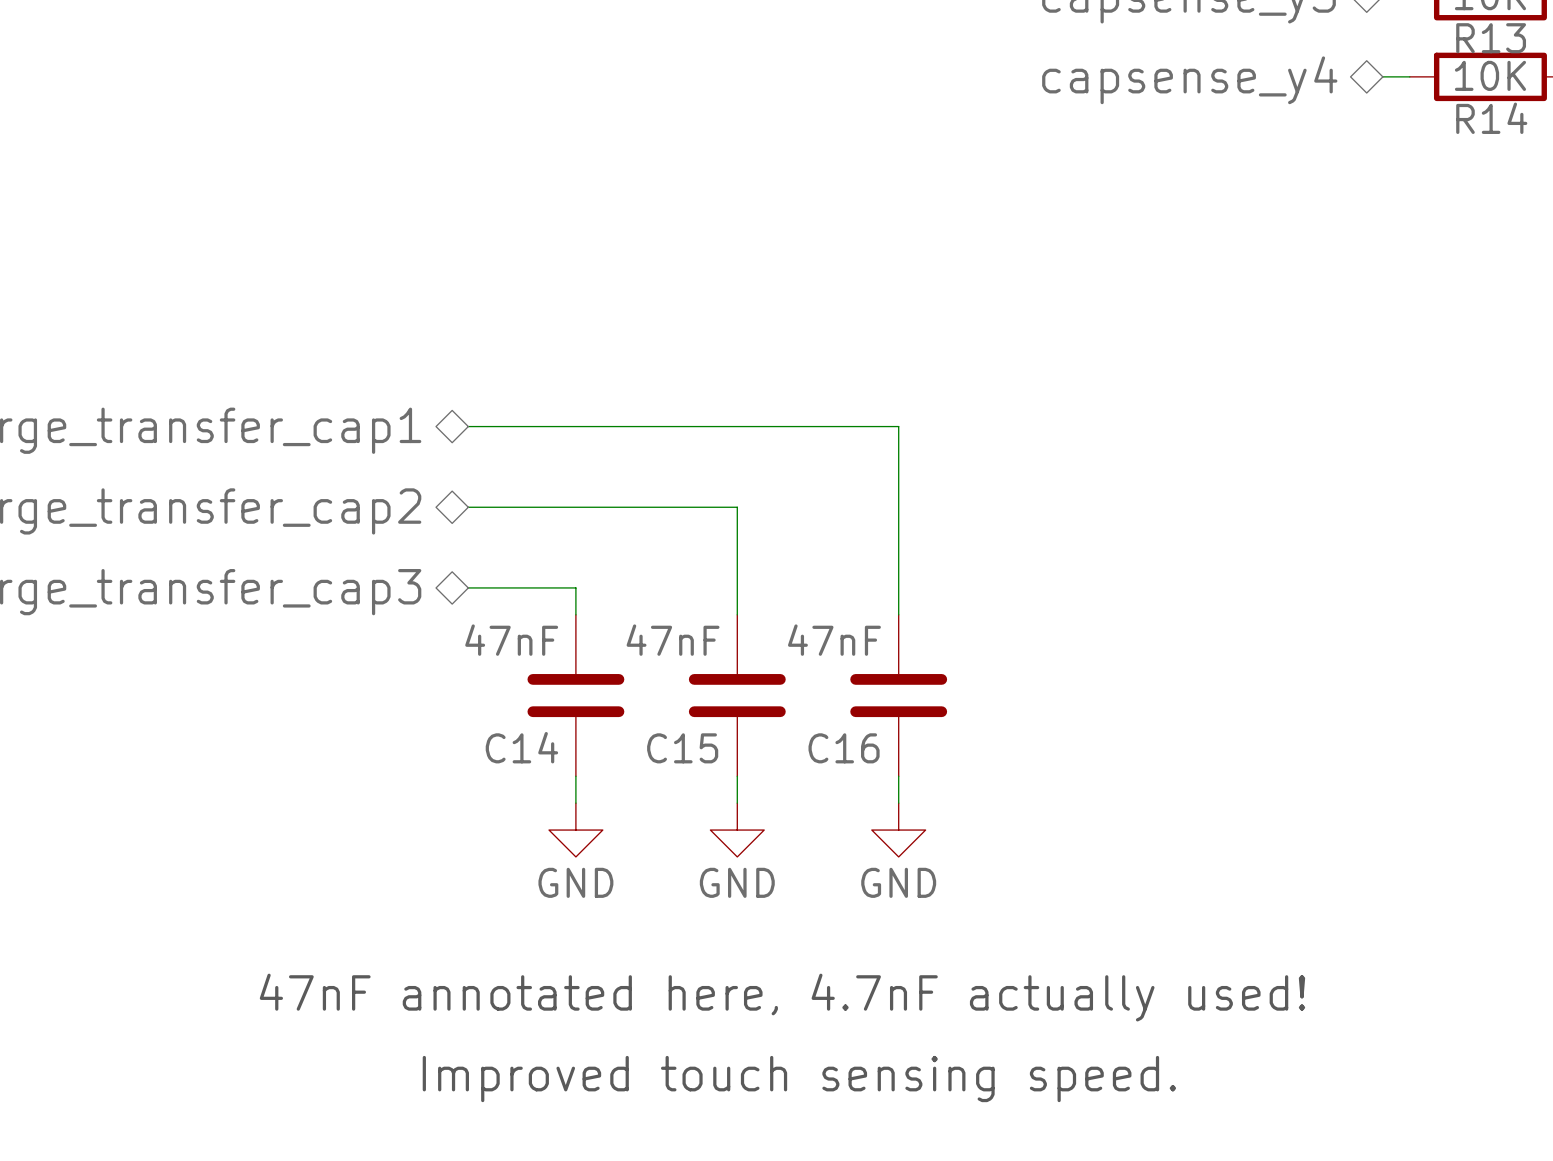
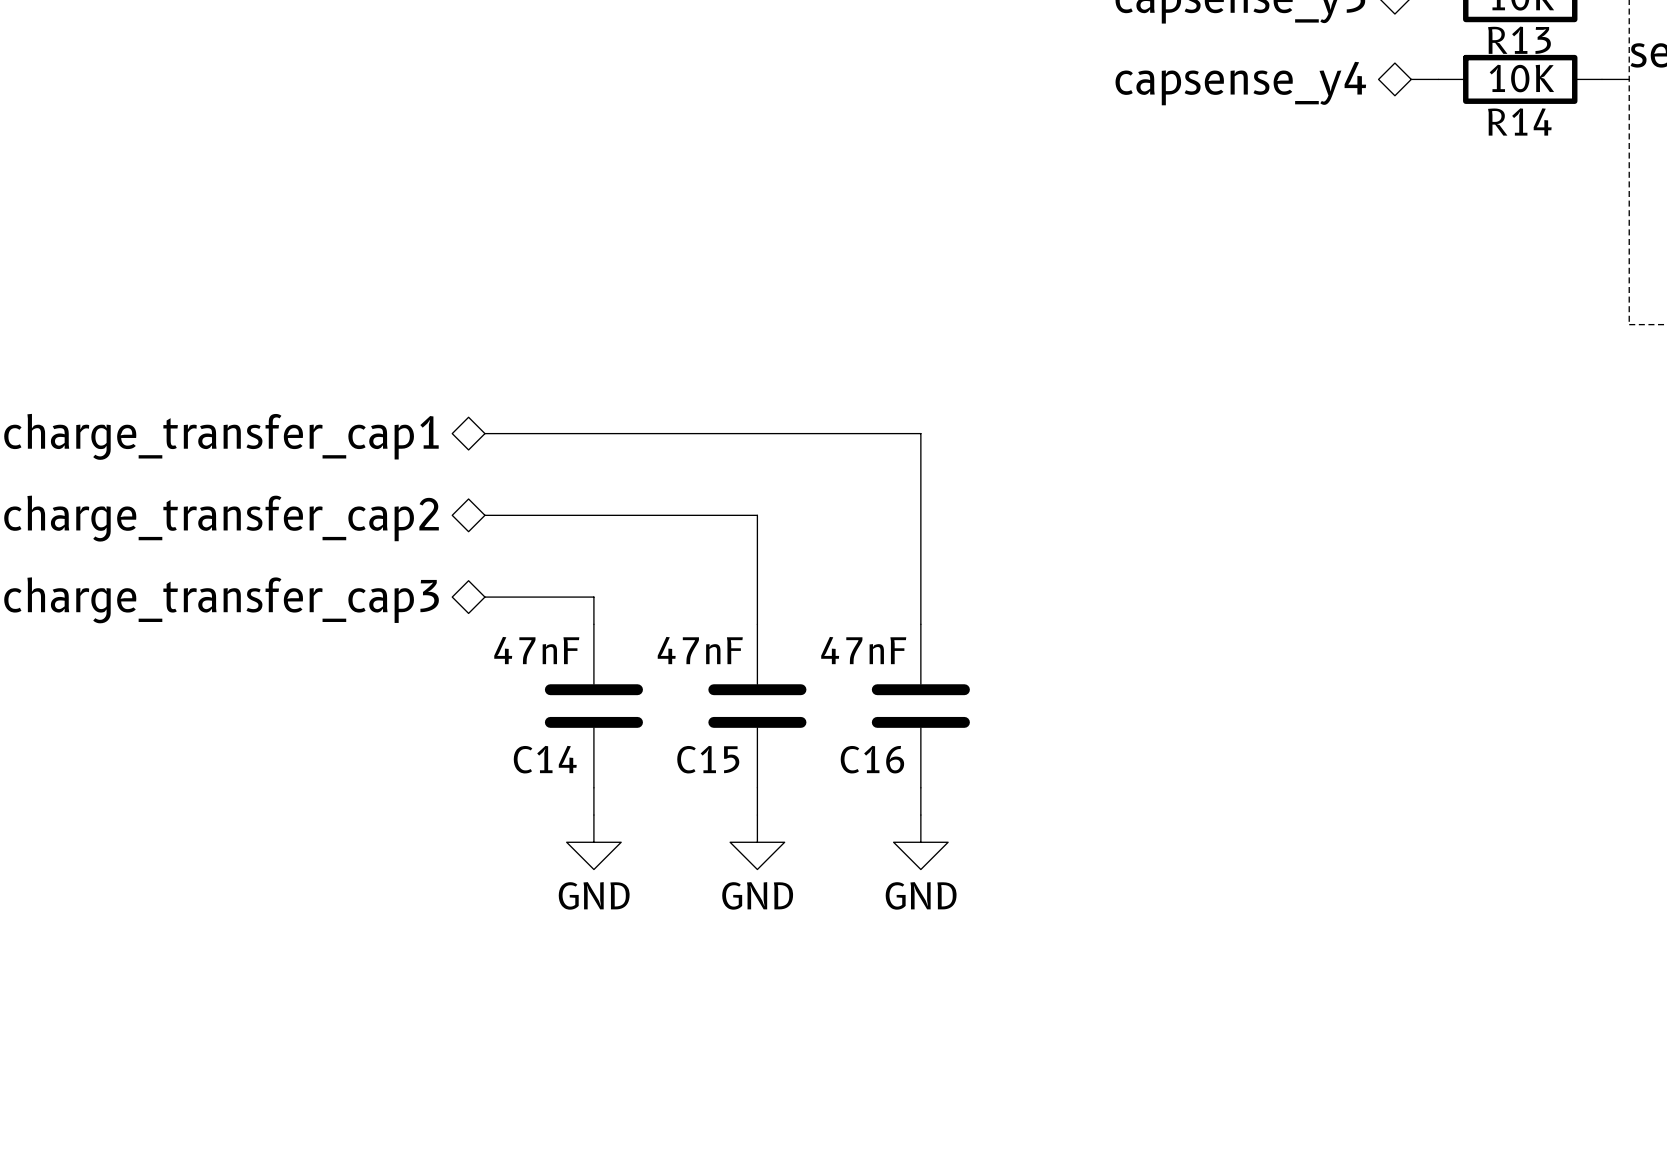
text: 47nF annotated here, 4.7nF actually used! (782, 997) -> none
text: Improved touch sensing speed. (799, 1079) -> none

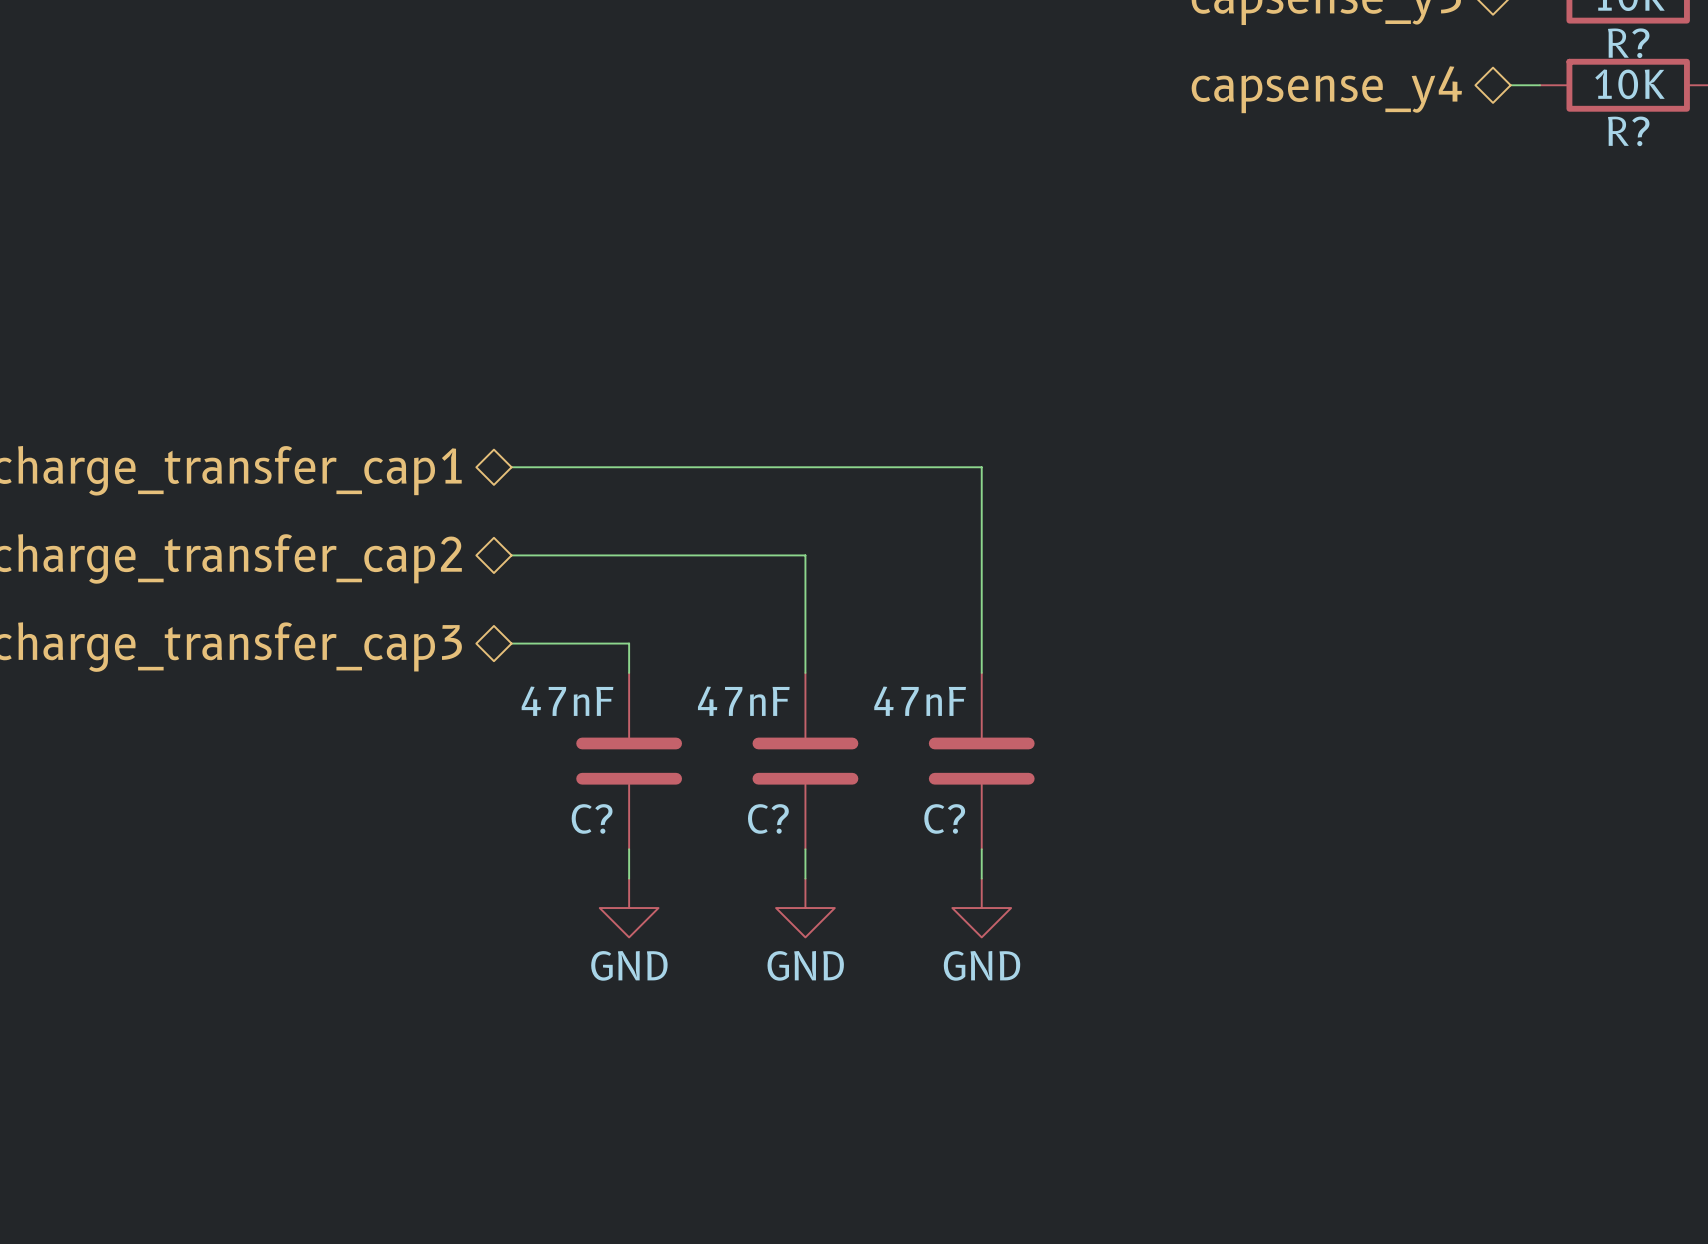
R13 name: R13 (1519, 40) -> R? (1628, 43)
R14 name: R14 (1519, 121) -> R? (1628, 131)
C14 name: C14 (545, 759) -> C? (592, 818)
C15 name: C15 (708, 759) -> C? (768, 818)
C16 name: C16 (872, 759) -> C? (944, 818)

